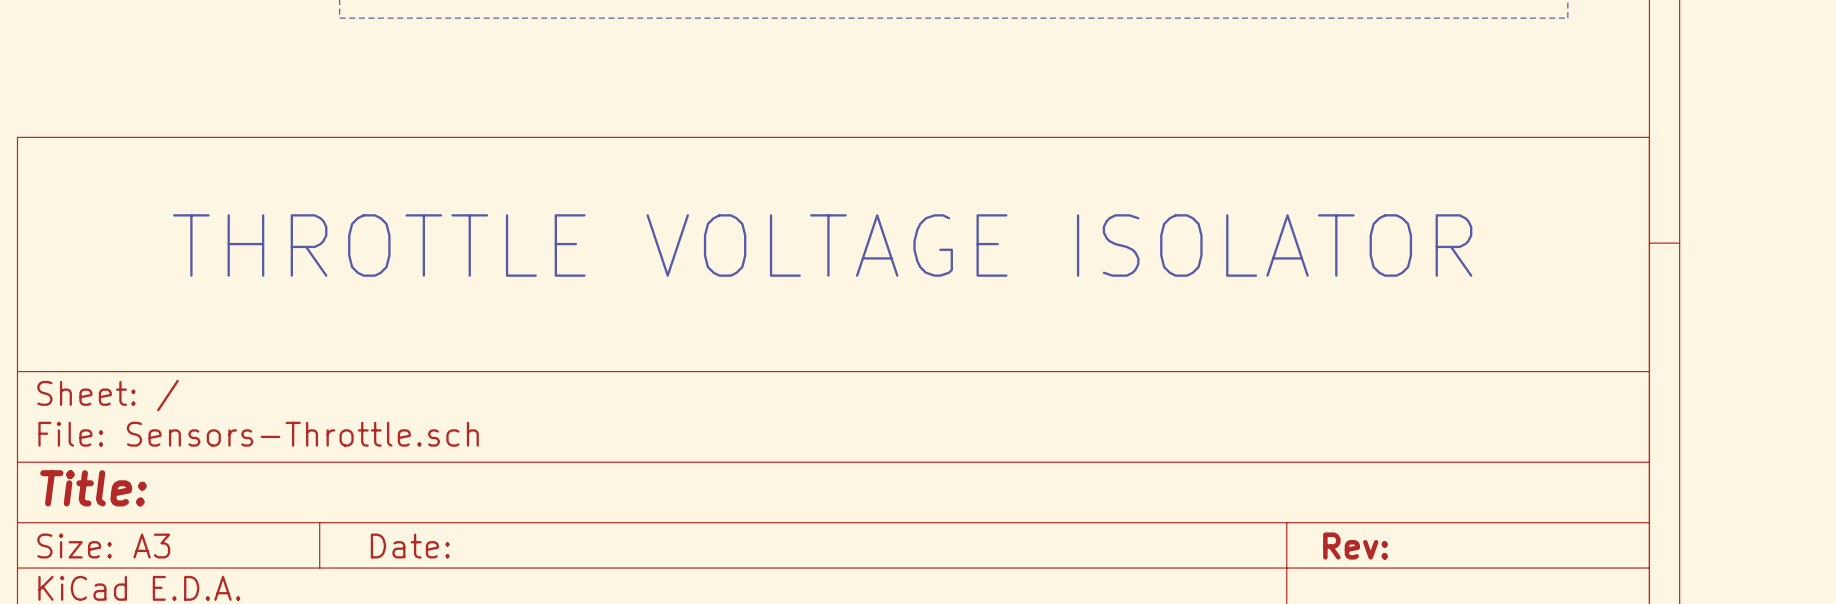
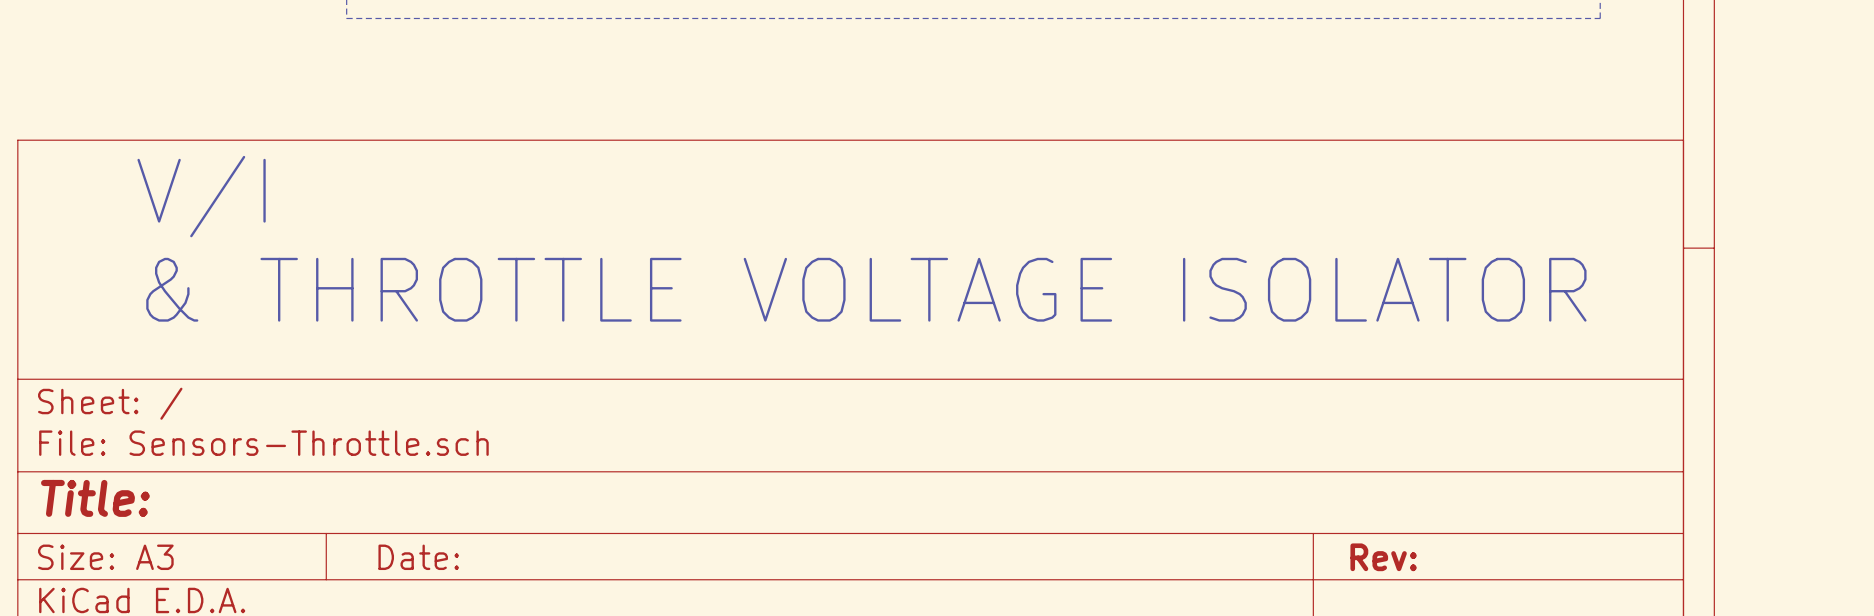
text: none -> V/I (201, 196)
text: THROTTLE VOLTAGE ISOLATOR (822, 245) -> & THROTTLE VOLTAGE ISOLATOR (866, 289)

